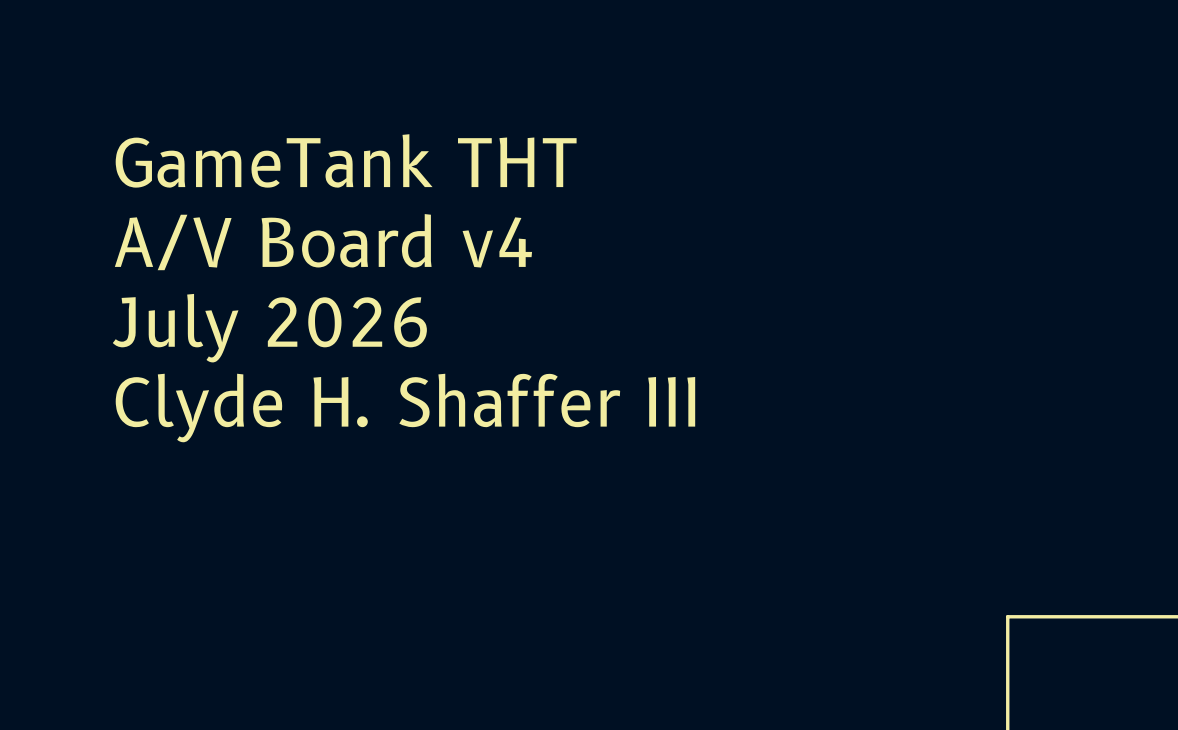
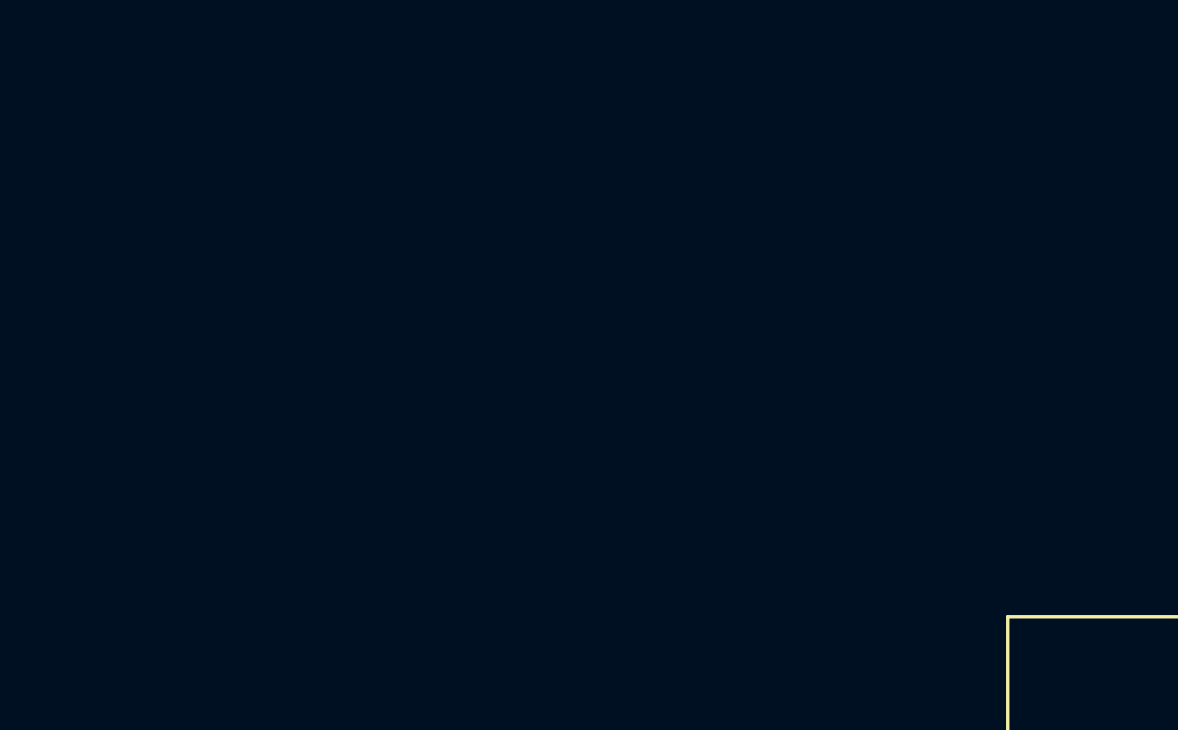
text: GameTank THT (346, 160) -> none
text: A/V Board v4 (323, 242) -> none
text: July 2026 (269, 328) -> none
text: Clyde H. Shaffer III (405, 408) -> none

